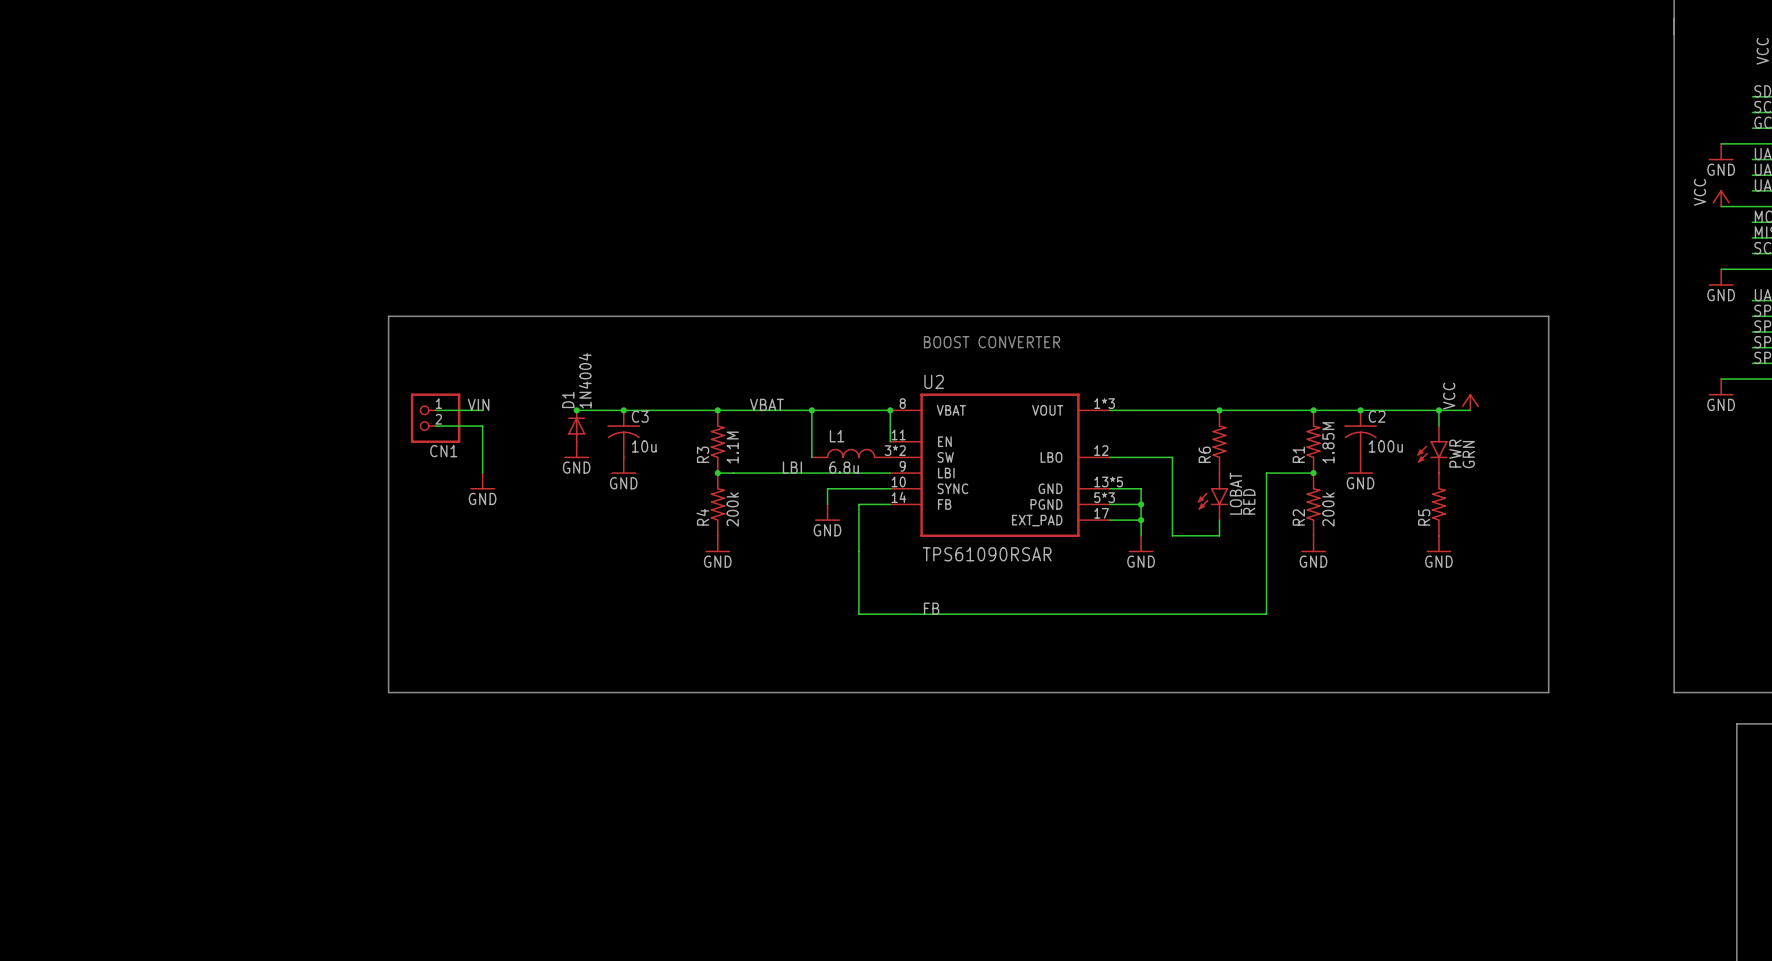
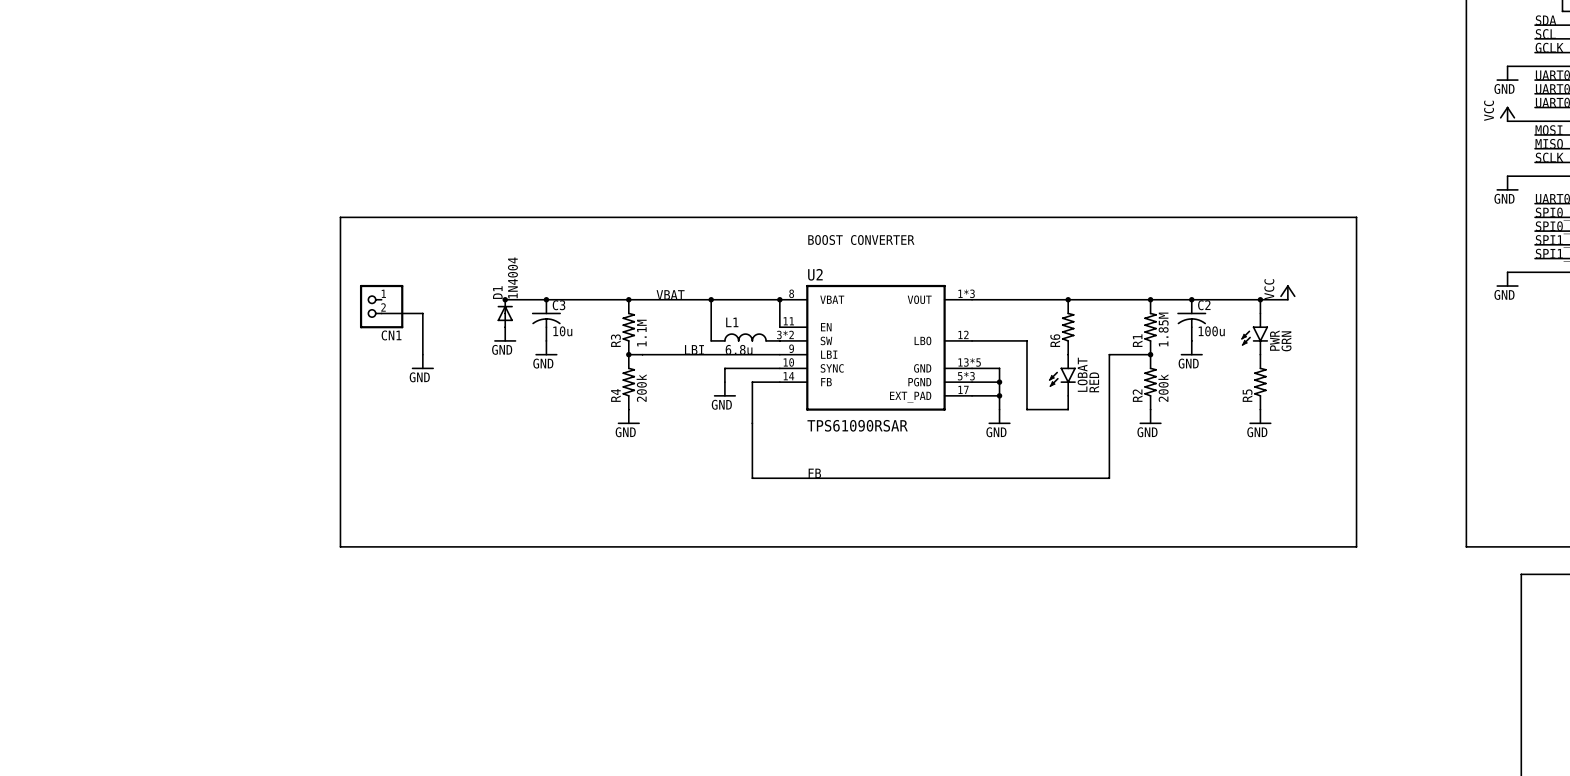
label: VIN (478, 404) -> none
wire: (435, 410) (482, 410) -> none

